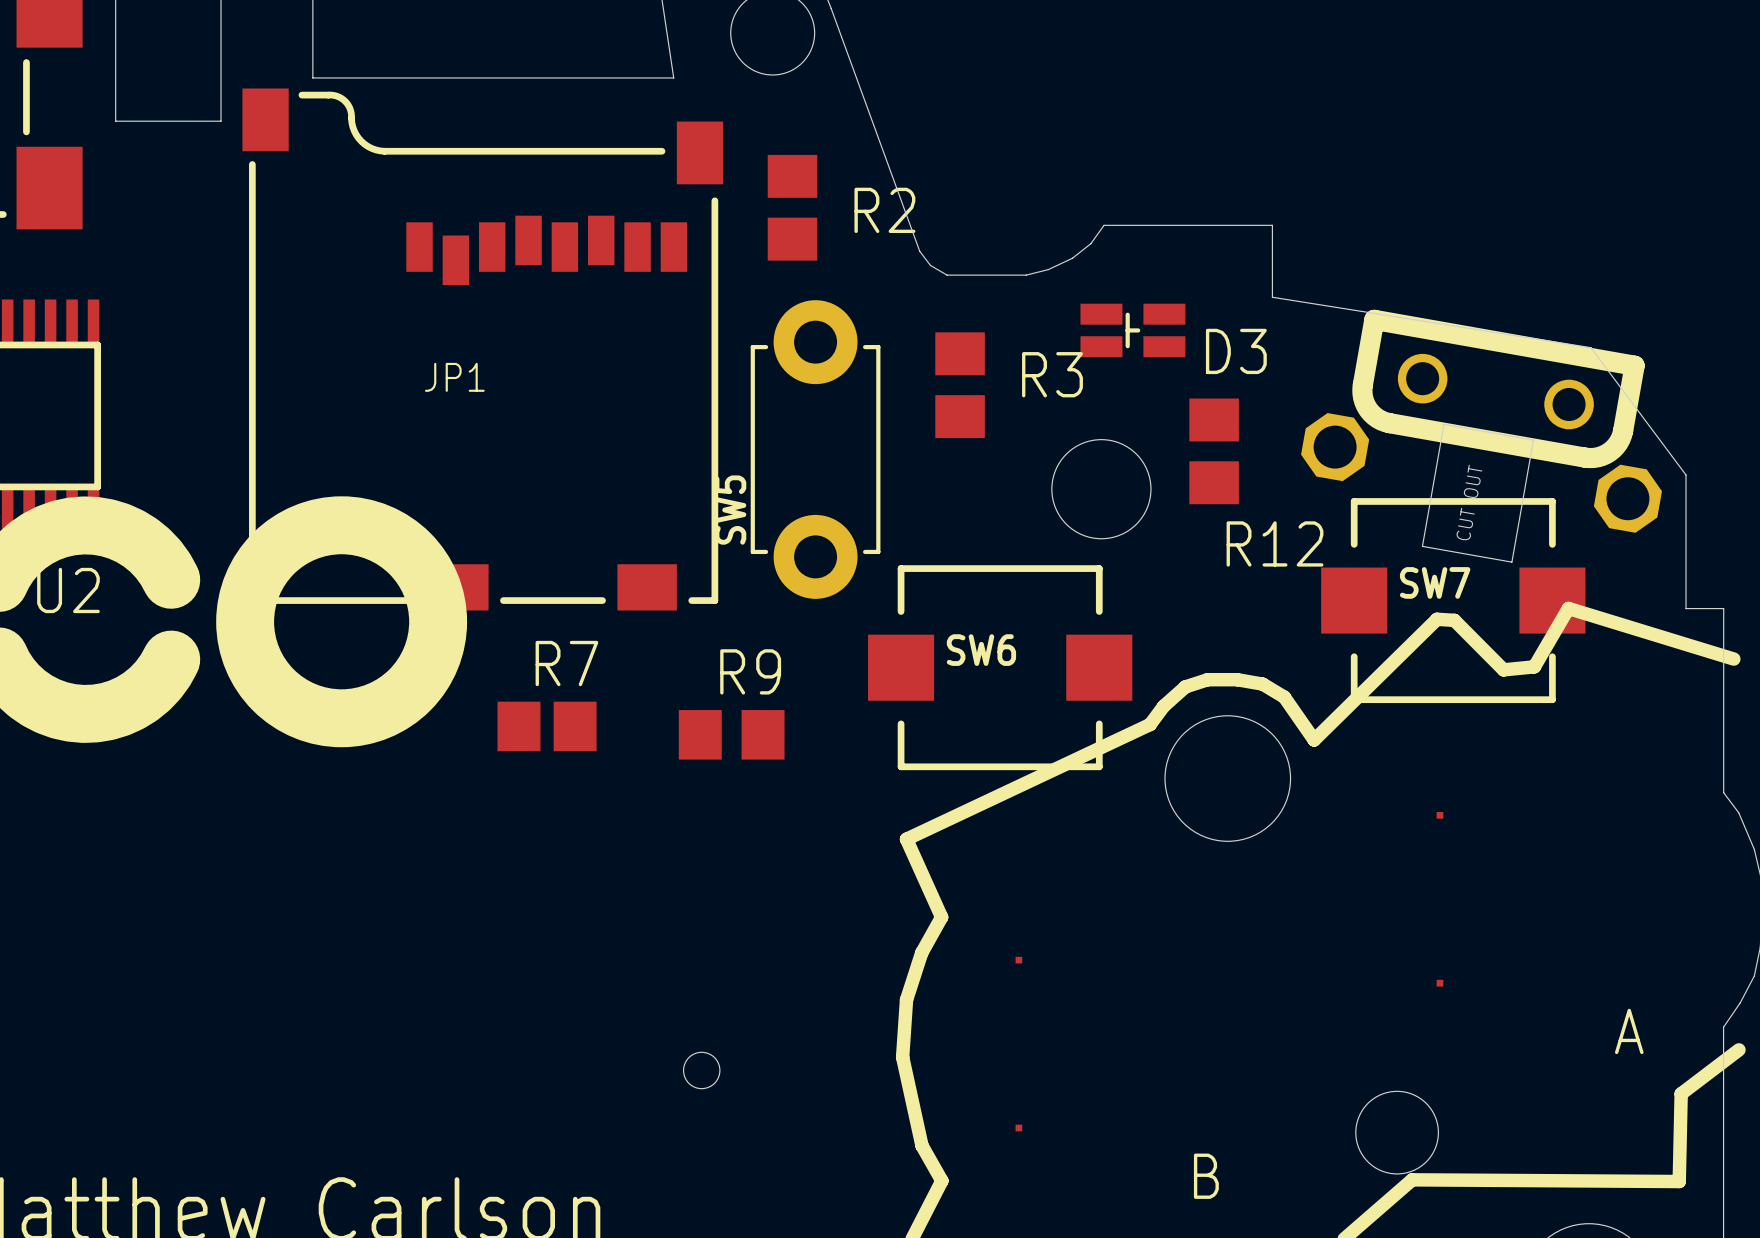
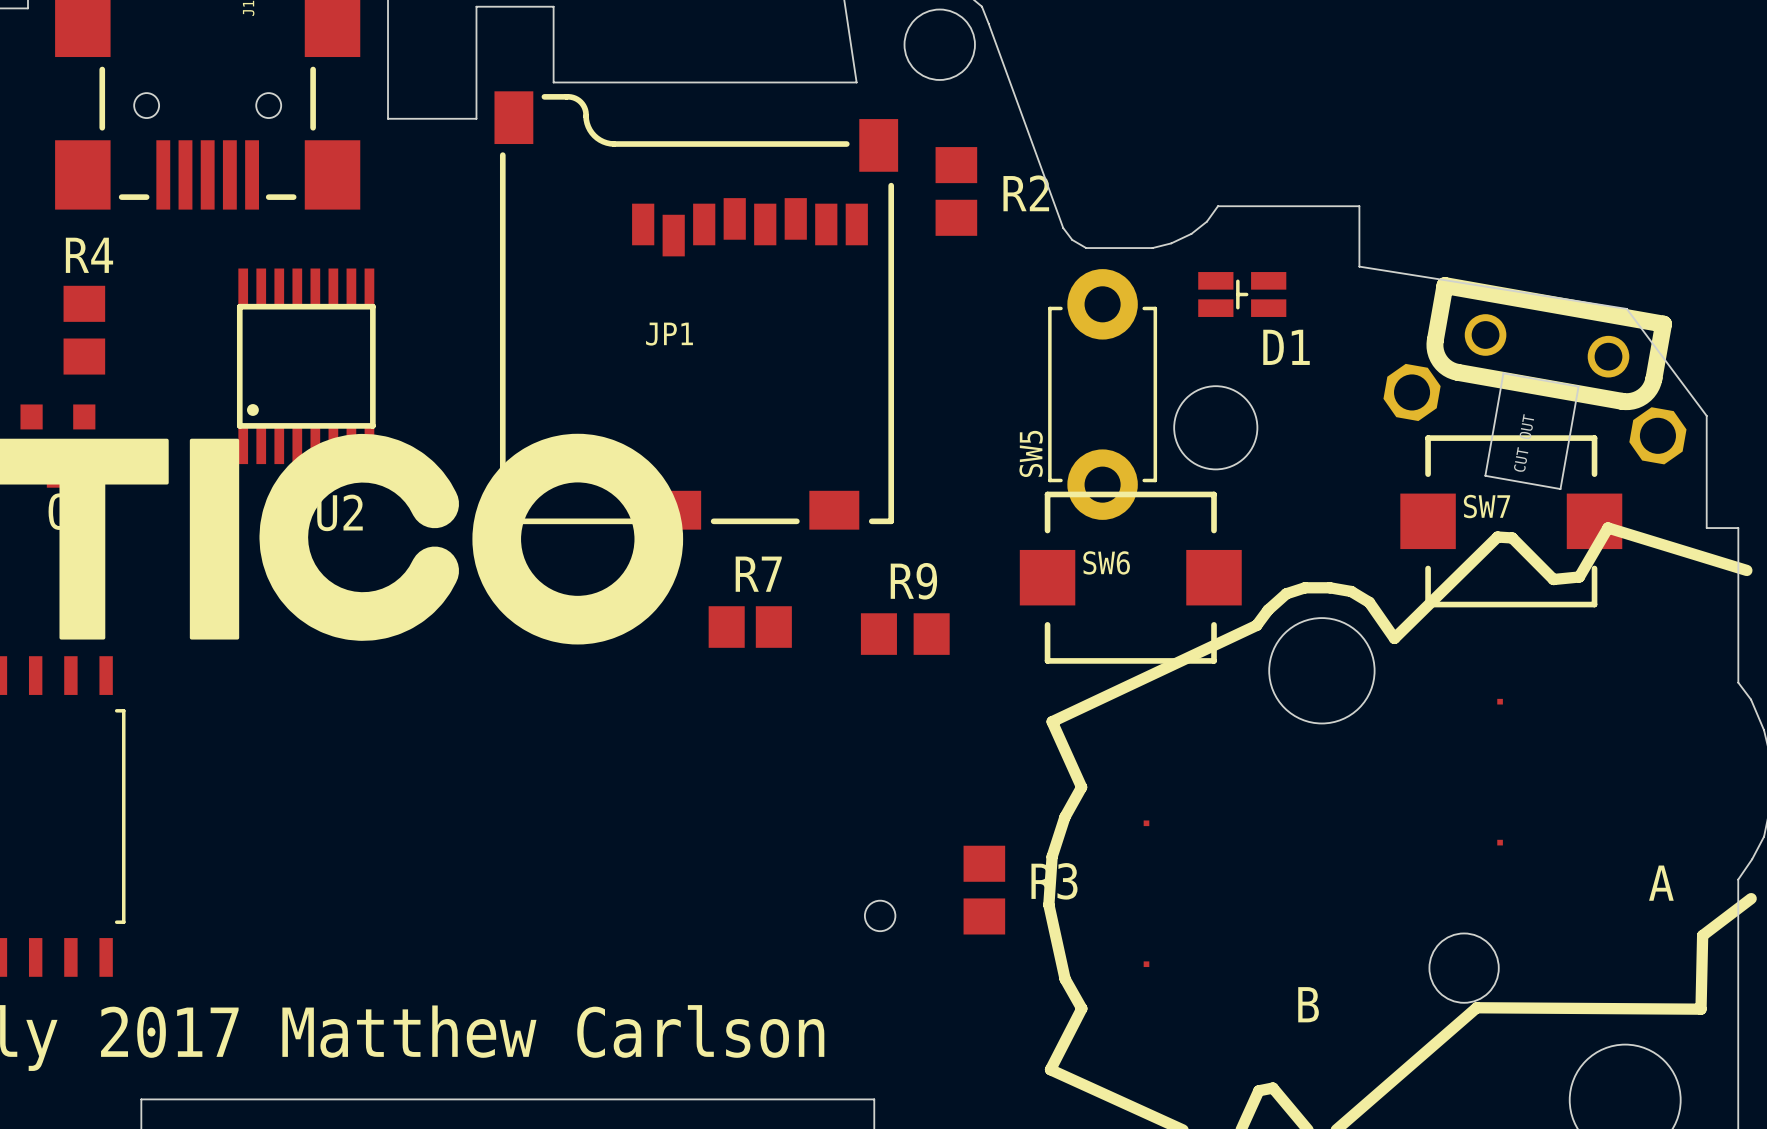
D3 name: D3 (1236, 351) -> D1 (1286, 347)
R3 position: (960, 385) -> (984, 890)
SW5 position: (815, 449) -> (1102, 394)
R12: (1214, 451) -> none

